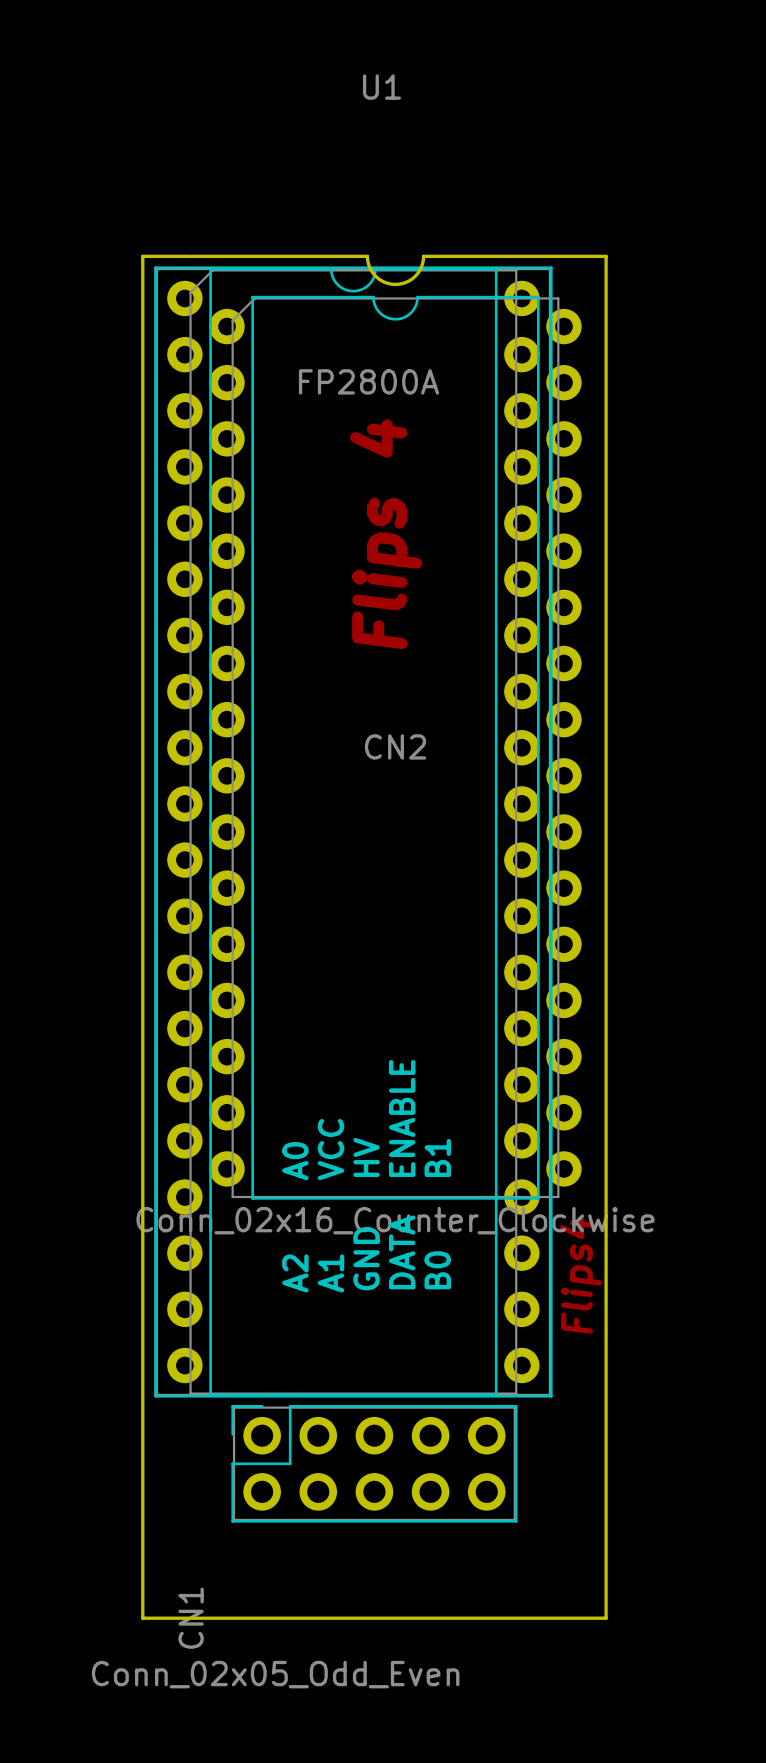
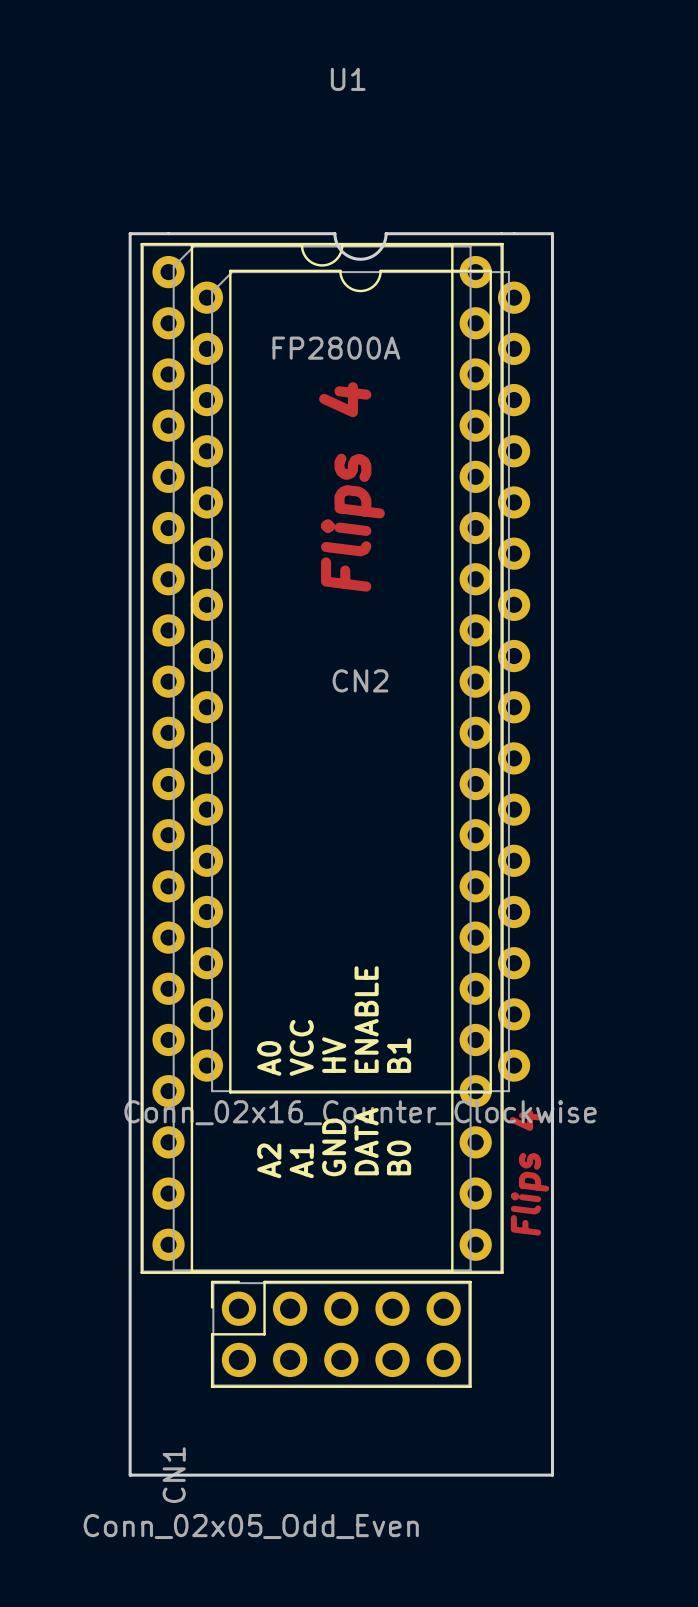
text: Flips4 (580, 1275) -> Flips 4 (529, 1172)

